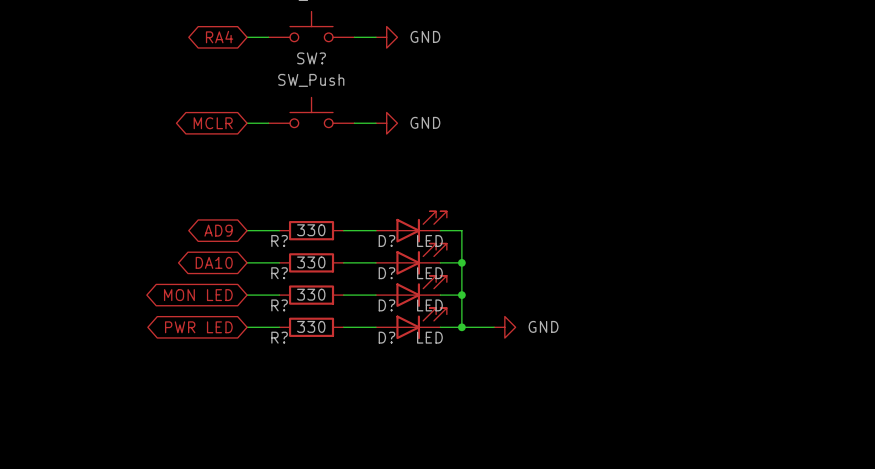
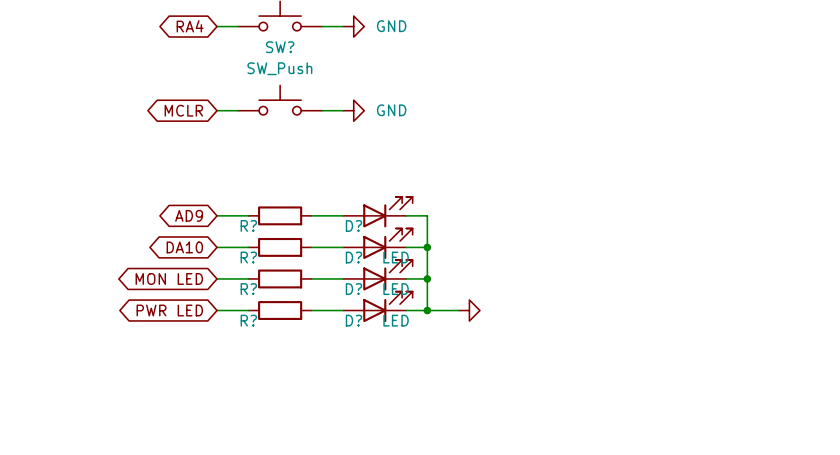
R? value: 330 (311, 230) -> none
D? value: LED (429, 240) -> none
R? value: 330 (311, 262) -> none
R? value: 330 (311, 294) -> none
R? value: 330 (311, 326) -> none
power symbol text: GND (543, 326) -> none

